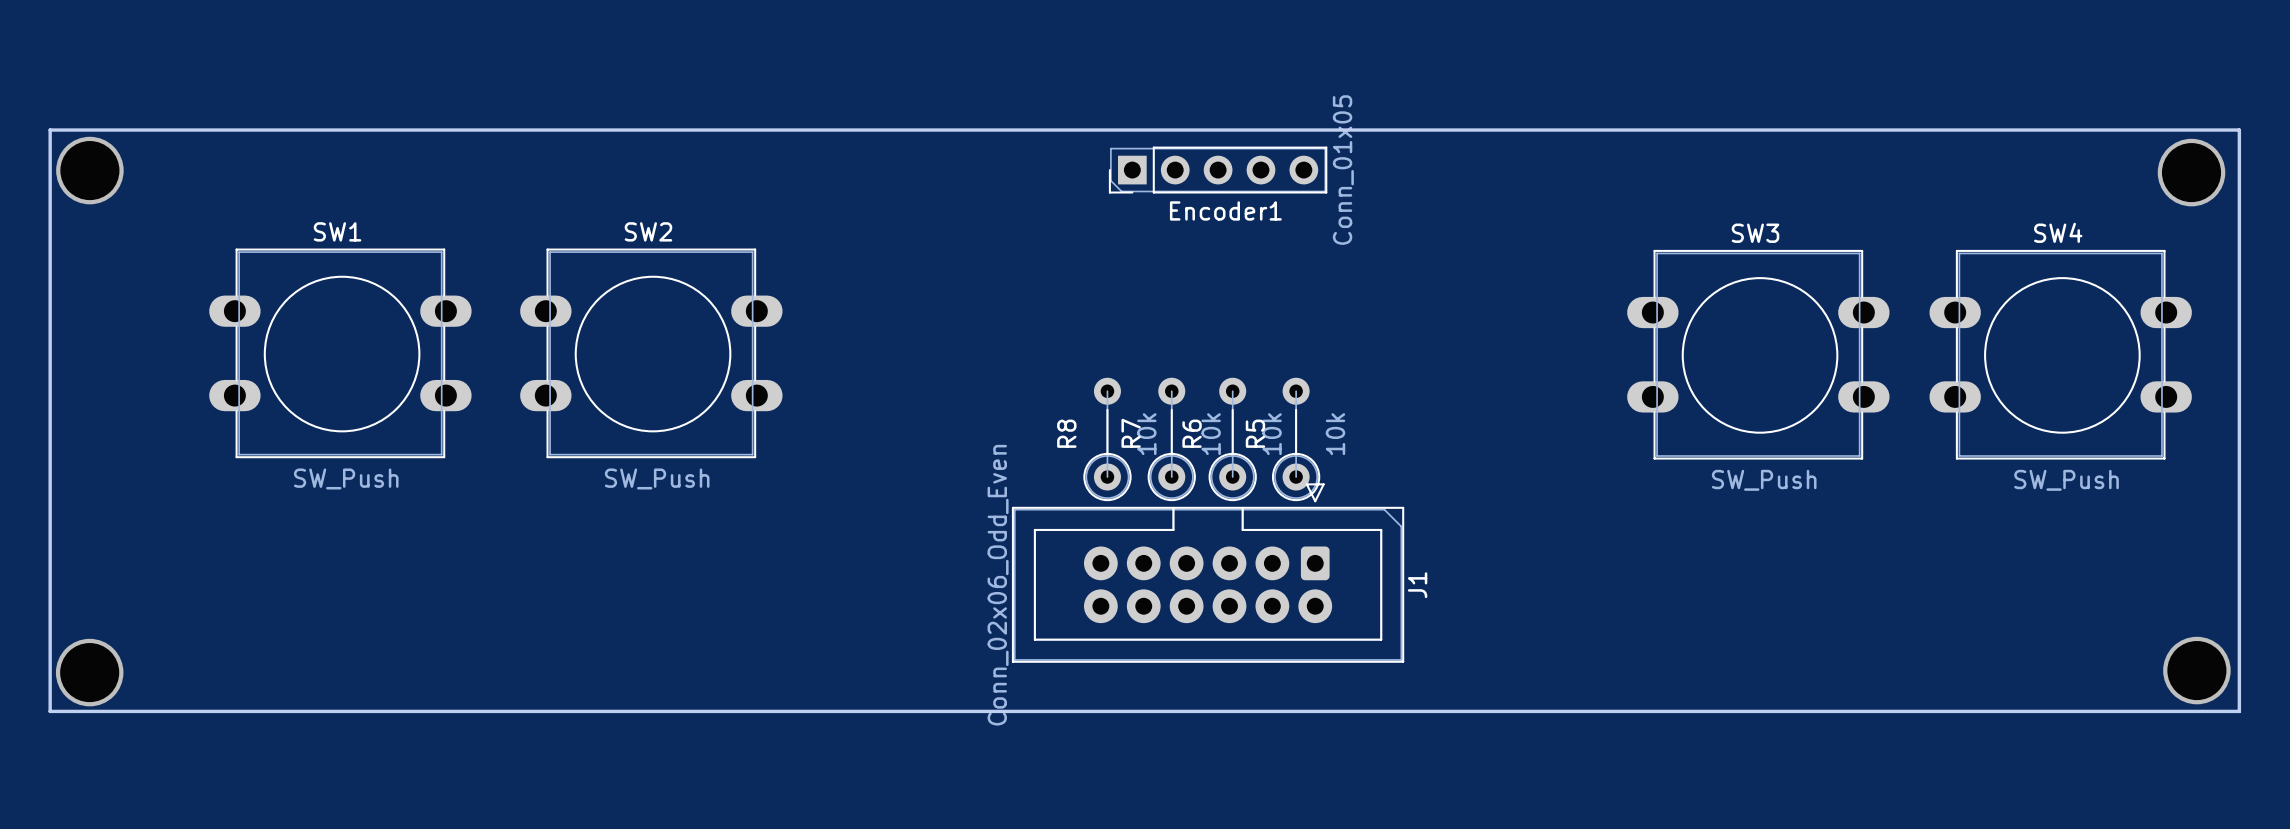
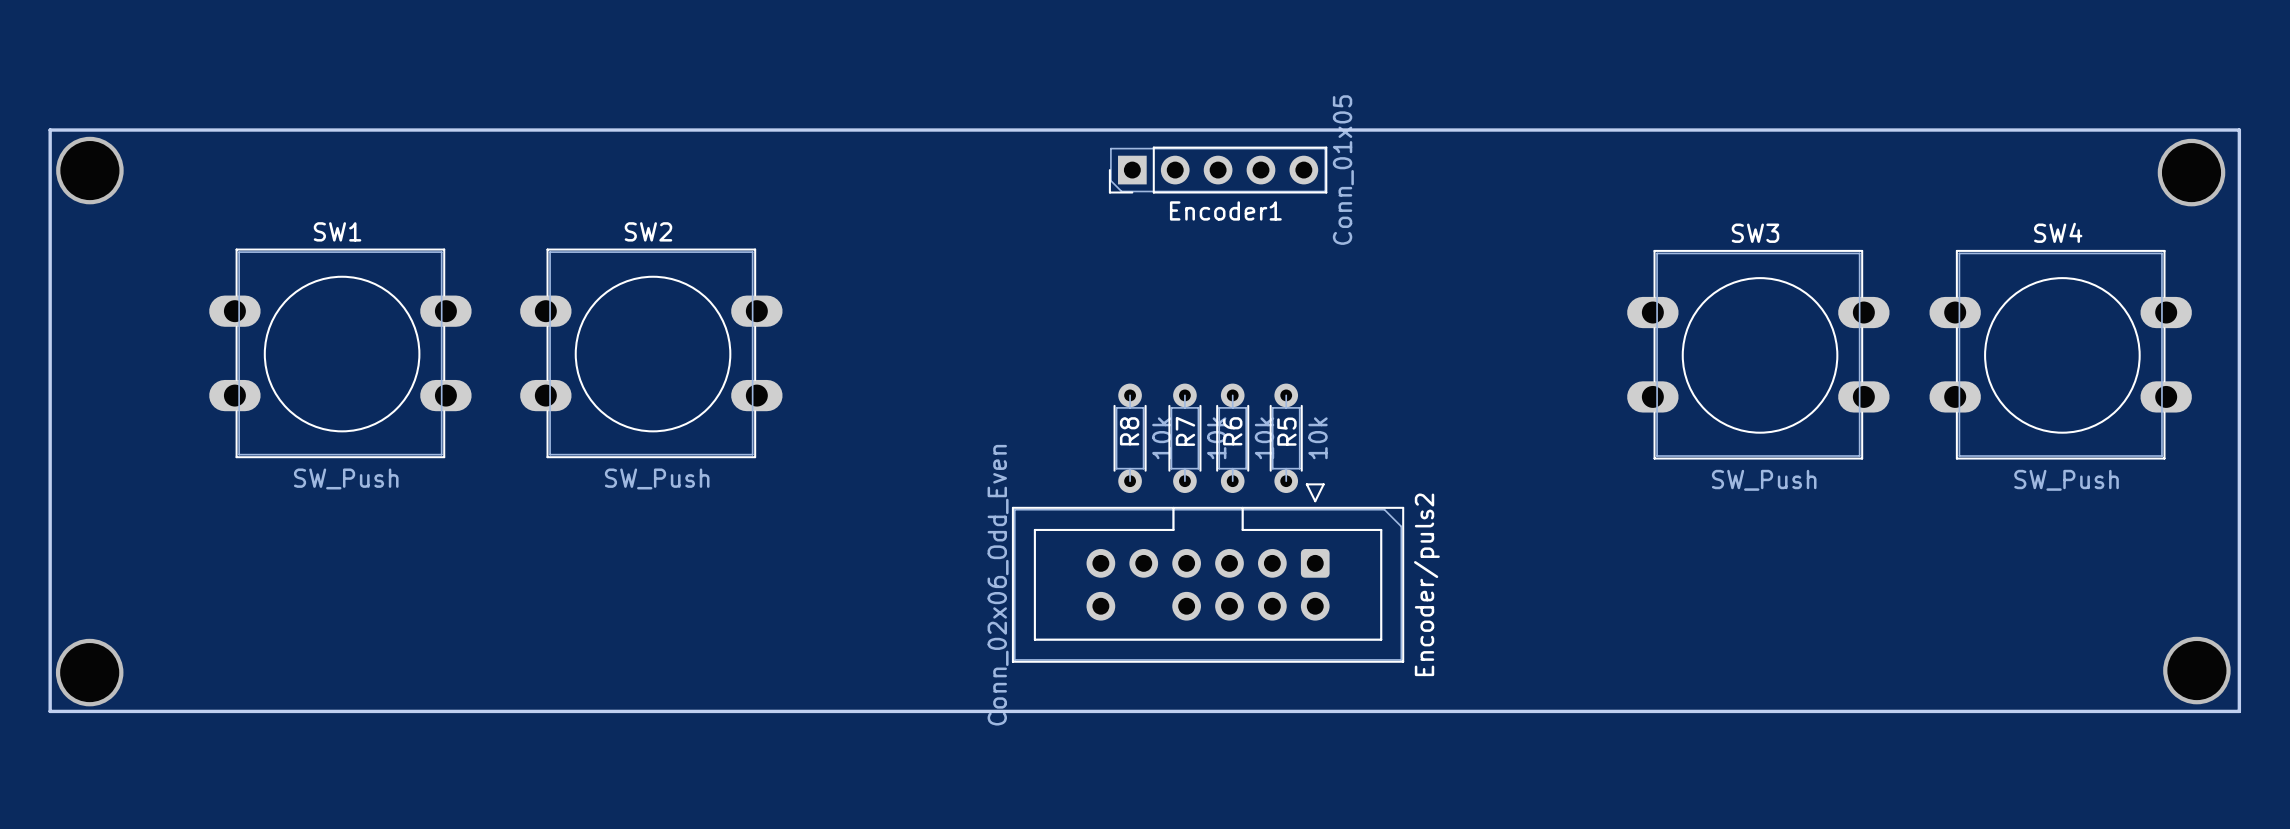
R8 footprint: [1083, 377, 1132, 502] -> [1113, 383, 1147, 493]
R7 footprint: [1147, 377, 1196, 502] -> [1168, 383, 1202, 493]
R6 footprint: [1208, 377, 1257, 502] -> [1216, 383, 1250, 493]
R5 footprint: [1271, 377, 1321, 502] -> [1269, 383, 1303, 493]
R8 name position: R8 (1066, 433) -> R8 (1129, 431)
R7 name position: R7 (1131, 433) -> R7 (1185, 431)
R6 name position: R6 (1192, 433) -> R6 (1232, 431)
R5 name position: R5 (1255, 433) -> R5 (1286, 431)
J1: Conn_02x06_Odd_Even (1208, 573) -> none
Encoder/puls2: none -> Conn_02x06_Odd_Even (1208, 573)

